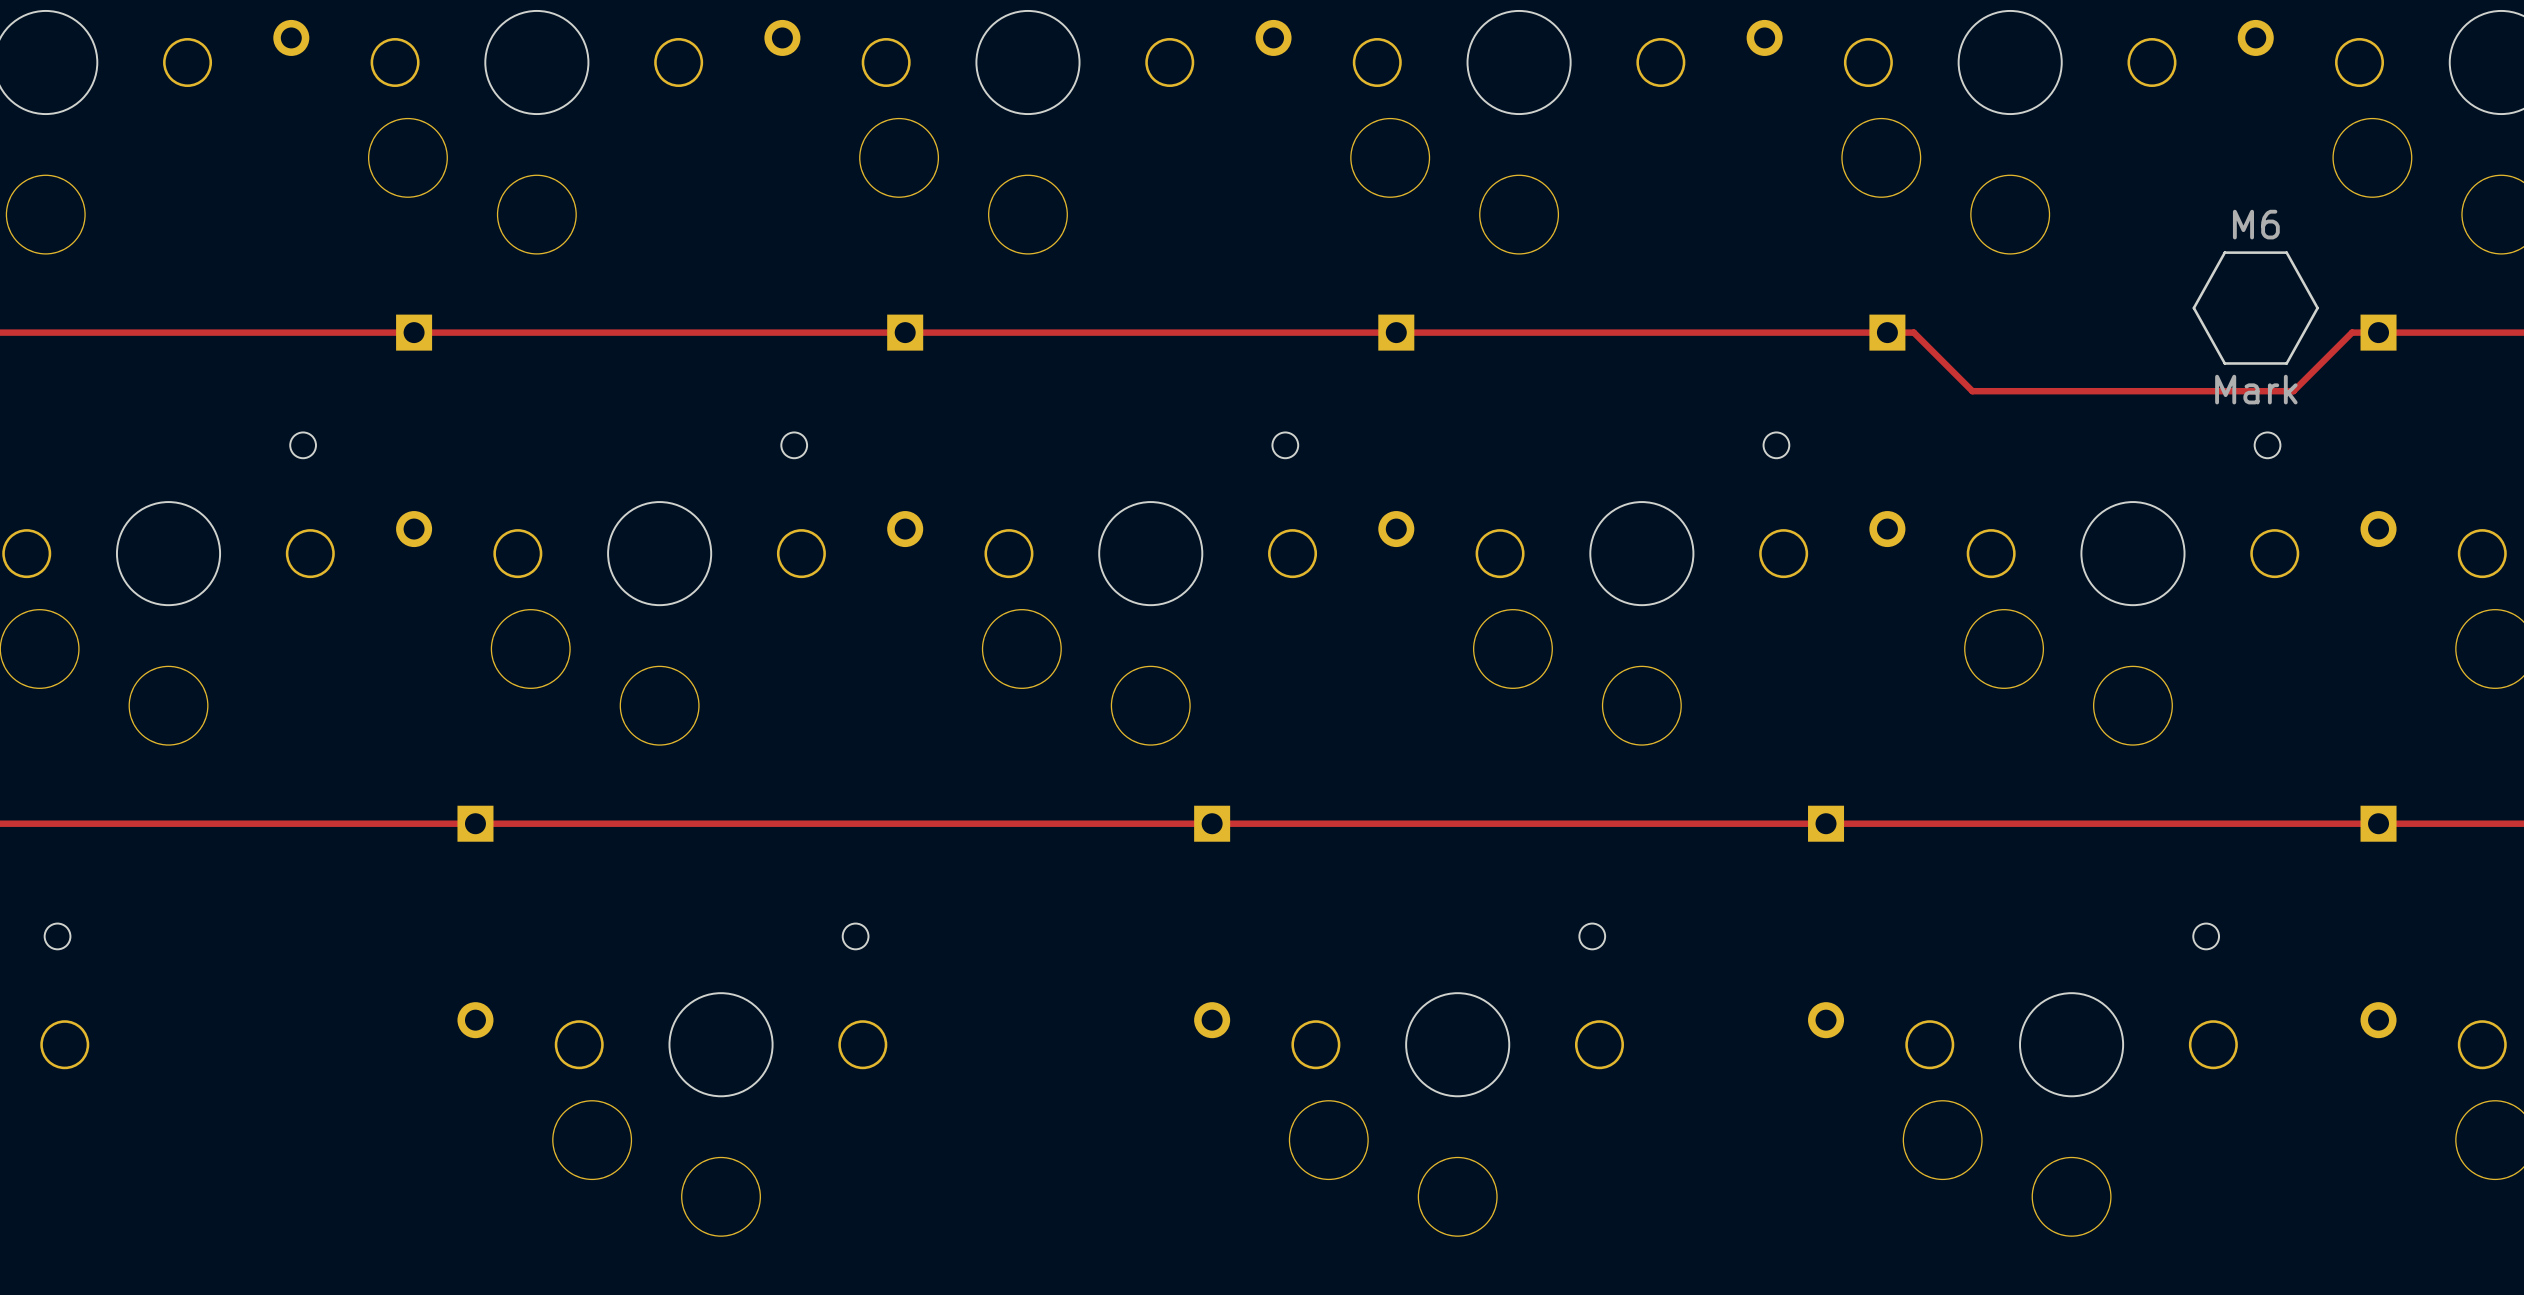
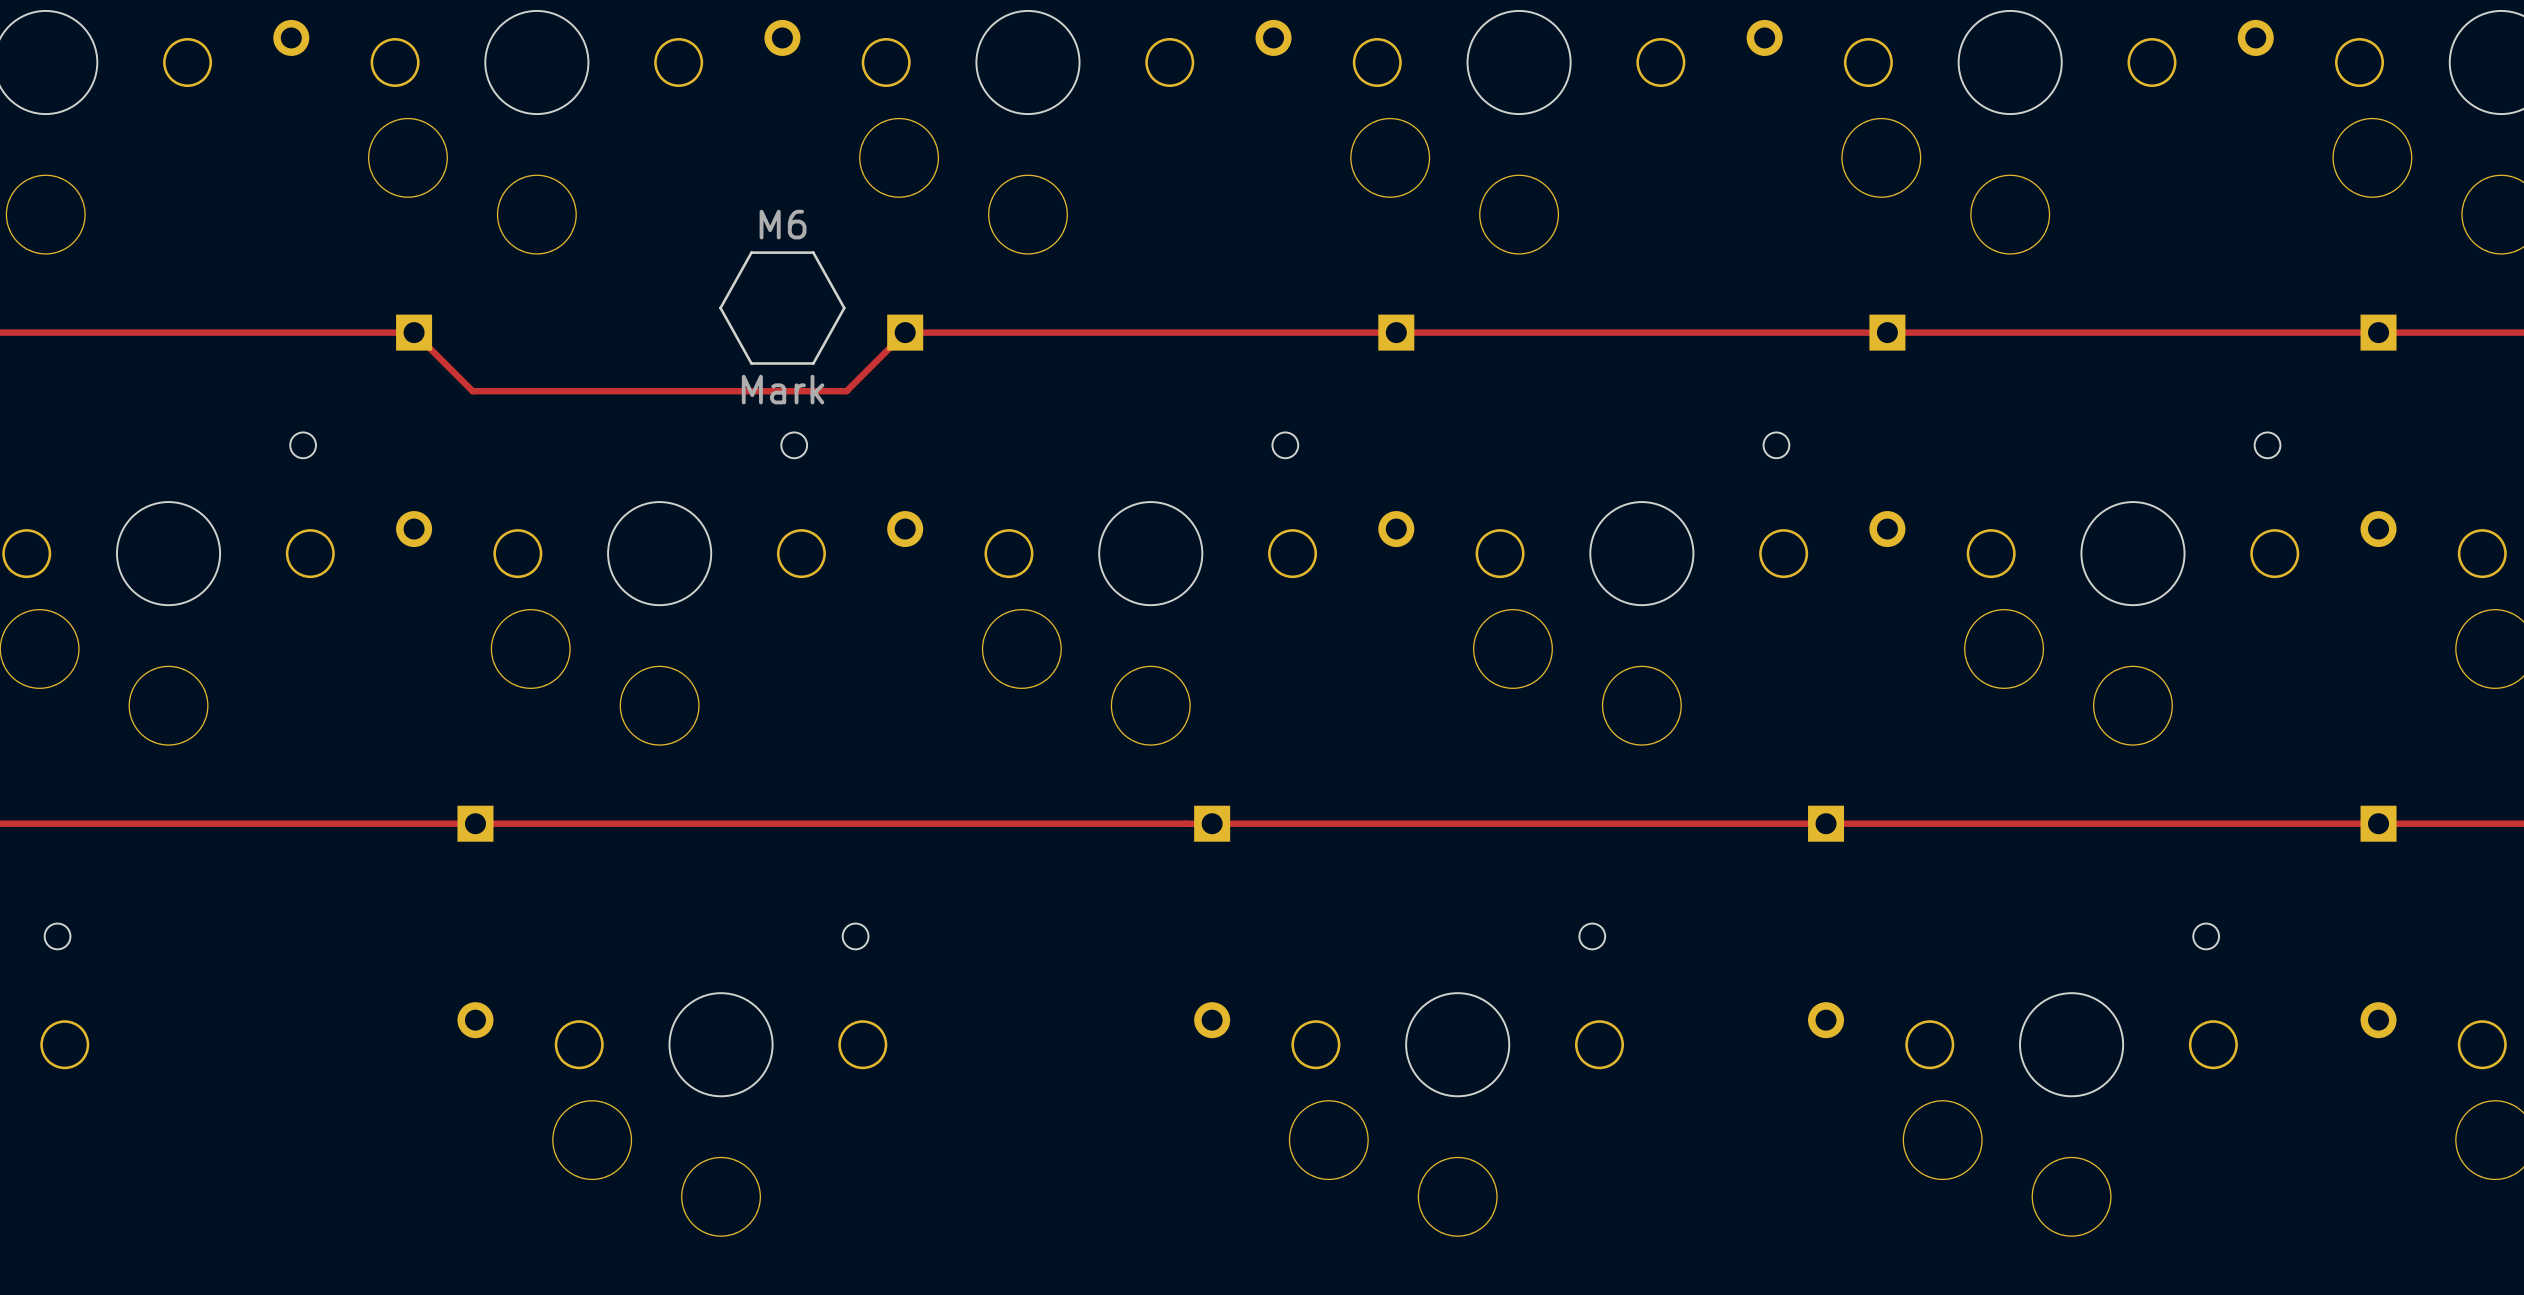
M6 position: (2255, 308) -> (782, 308)
track: (414, 332) (905, 332) -> (414, 332) (472, 391) (846, 391) (905, 332)
track: (1913, 332) (1972, 391) (2293, 391) (2352, 332) -> (1913, 332) (2352, 332)

